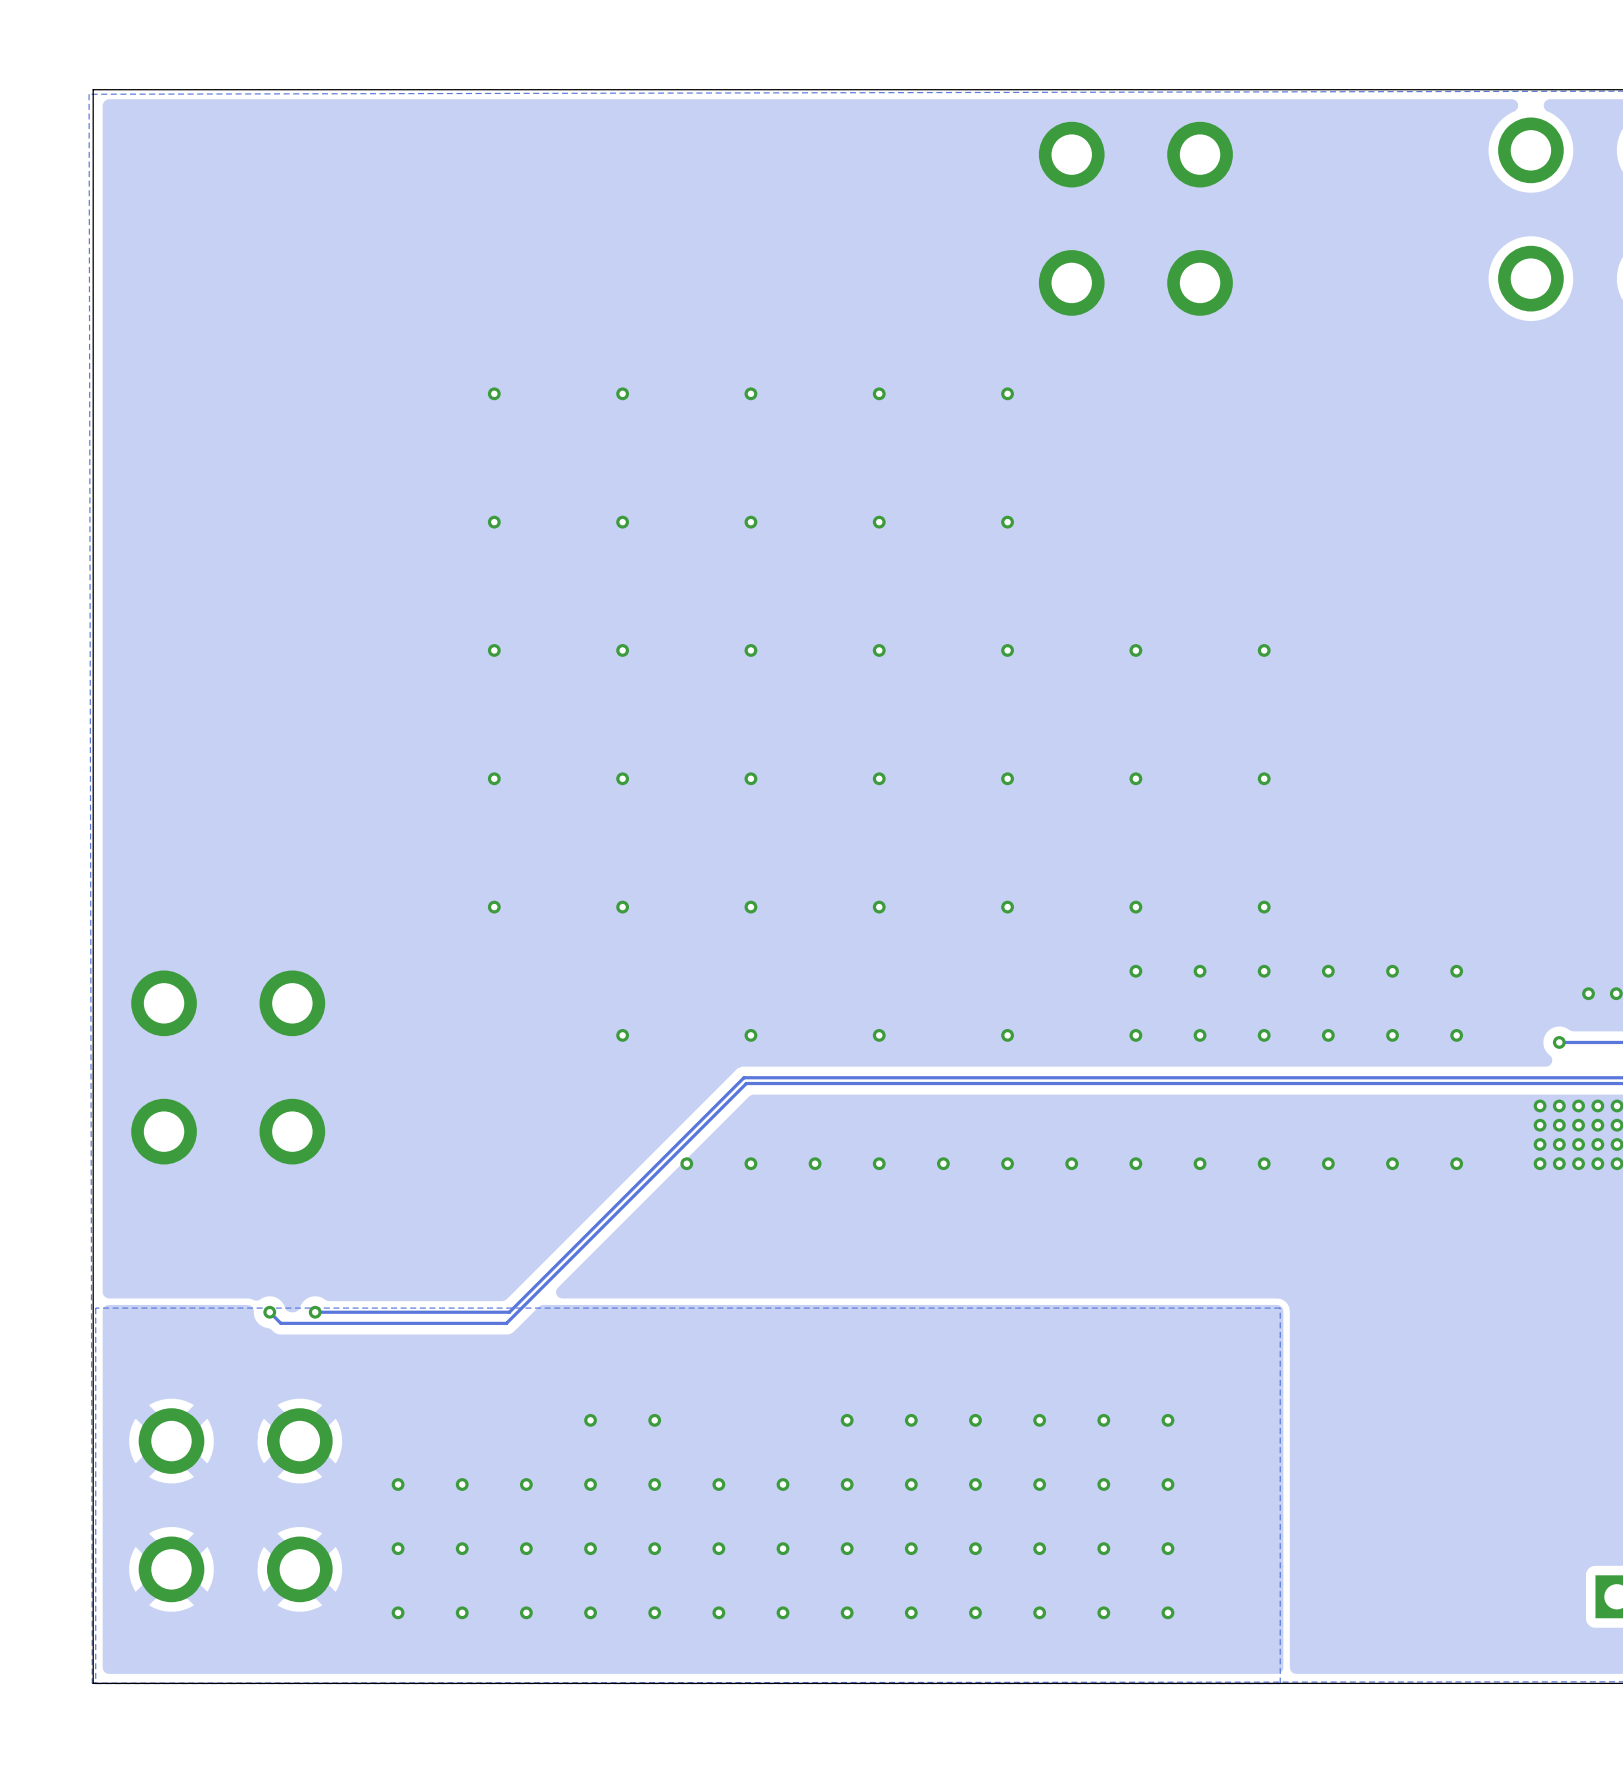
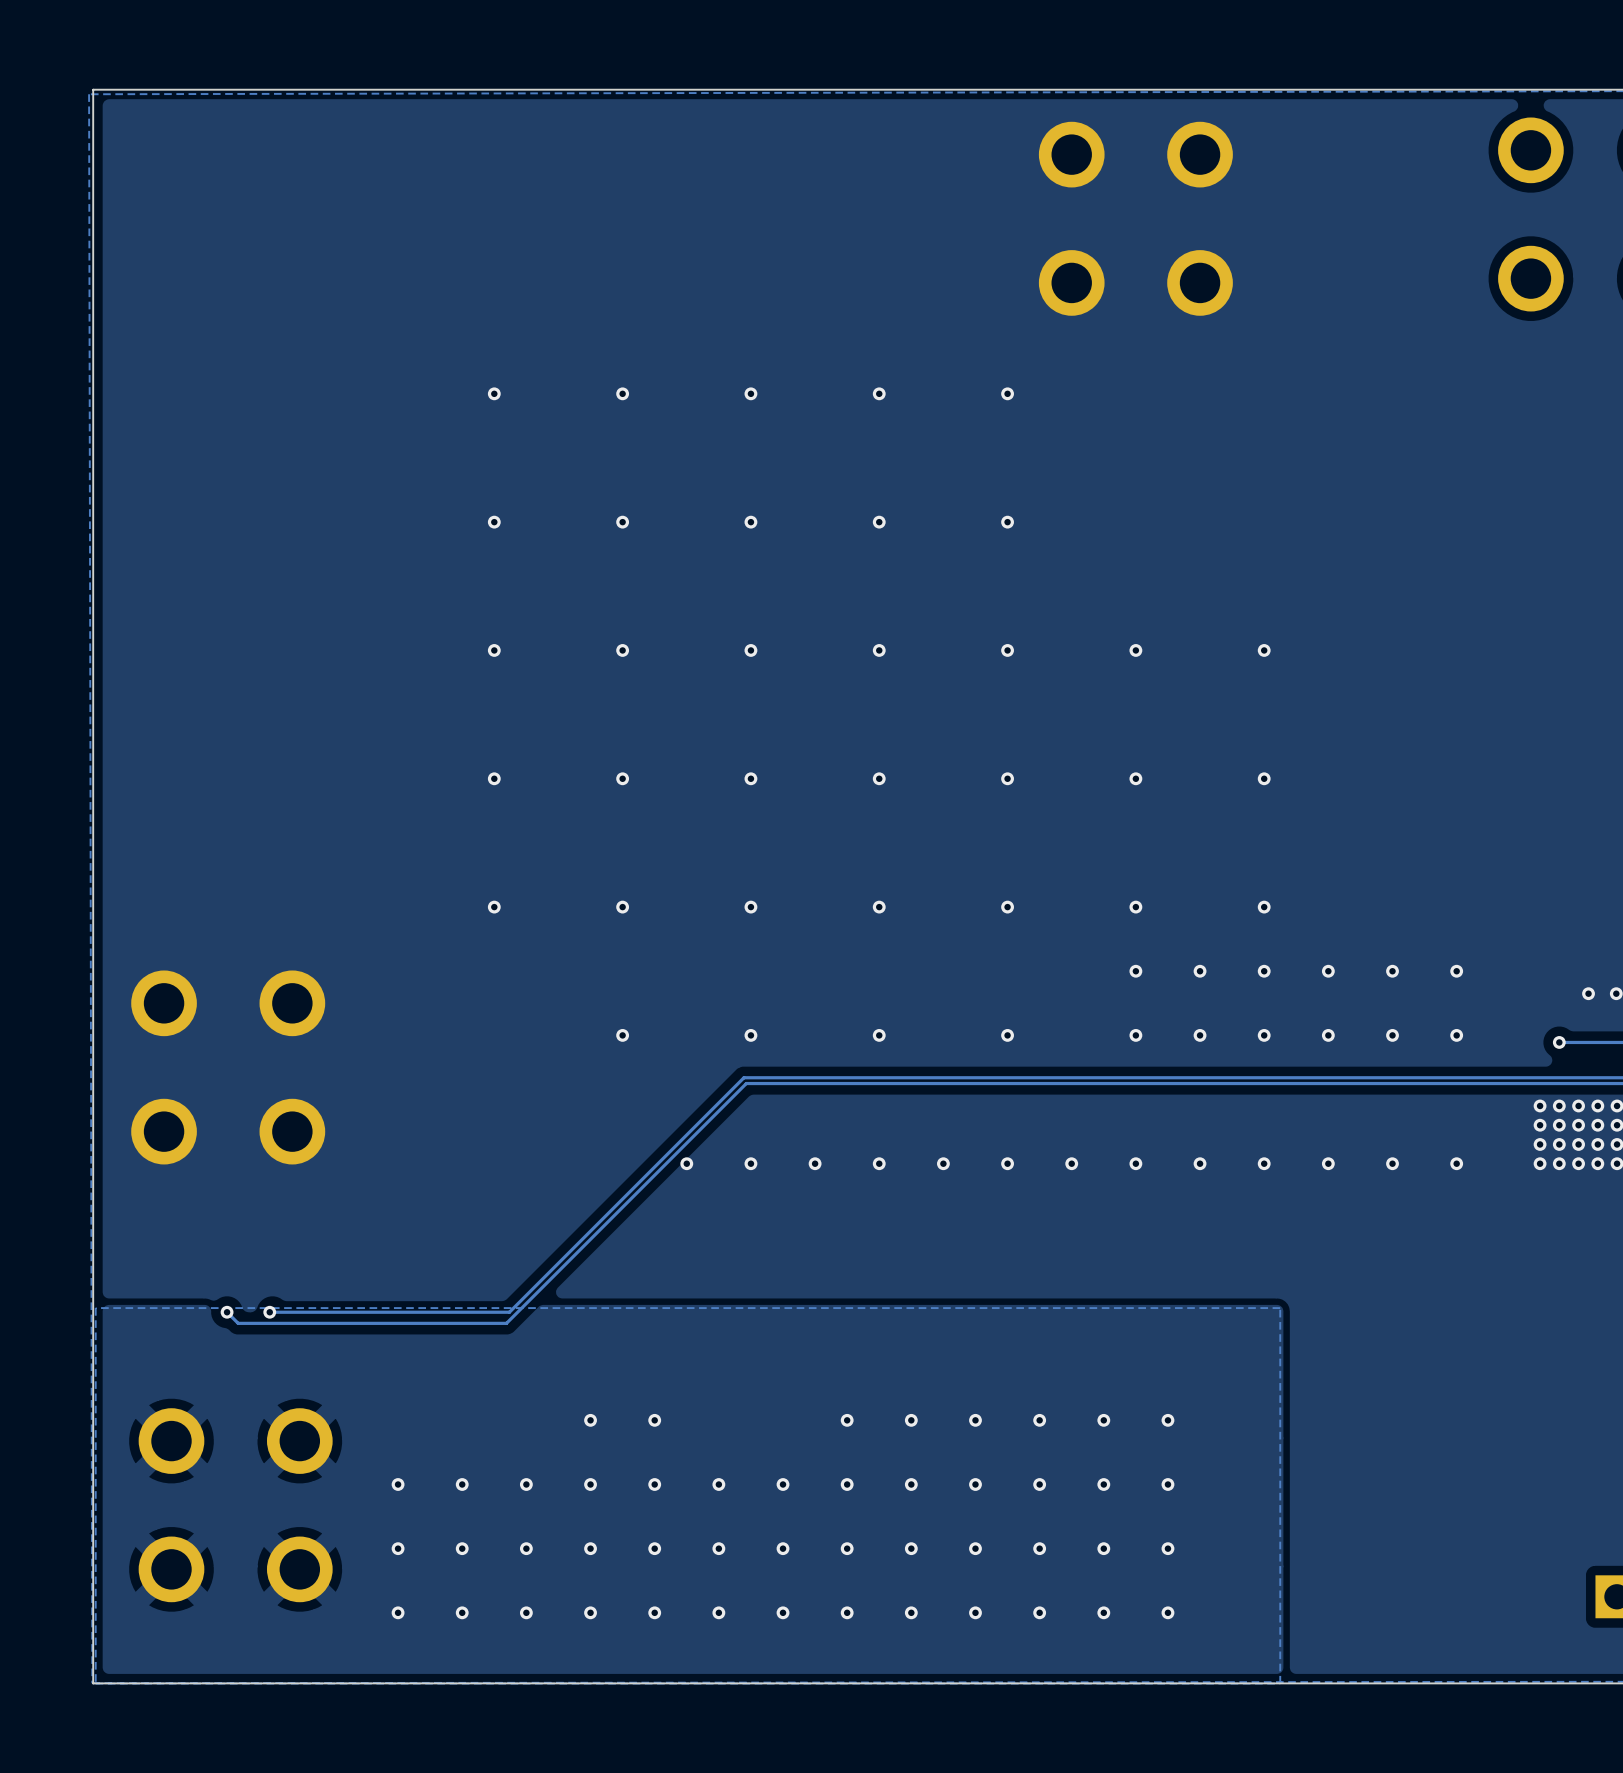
track: (269, 1312) (280, 1323) -> (227, 1312) (238, 1323) (280, 1323)
track: none -> (315, 1312) (272, 1312)
via position: (315, 1312) -> (227, 1312)

